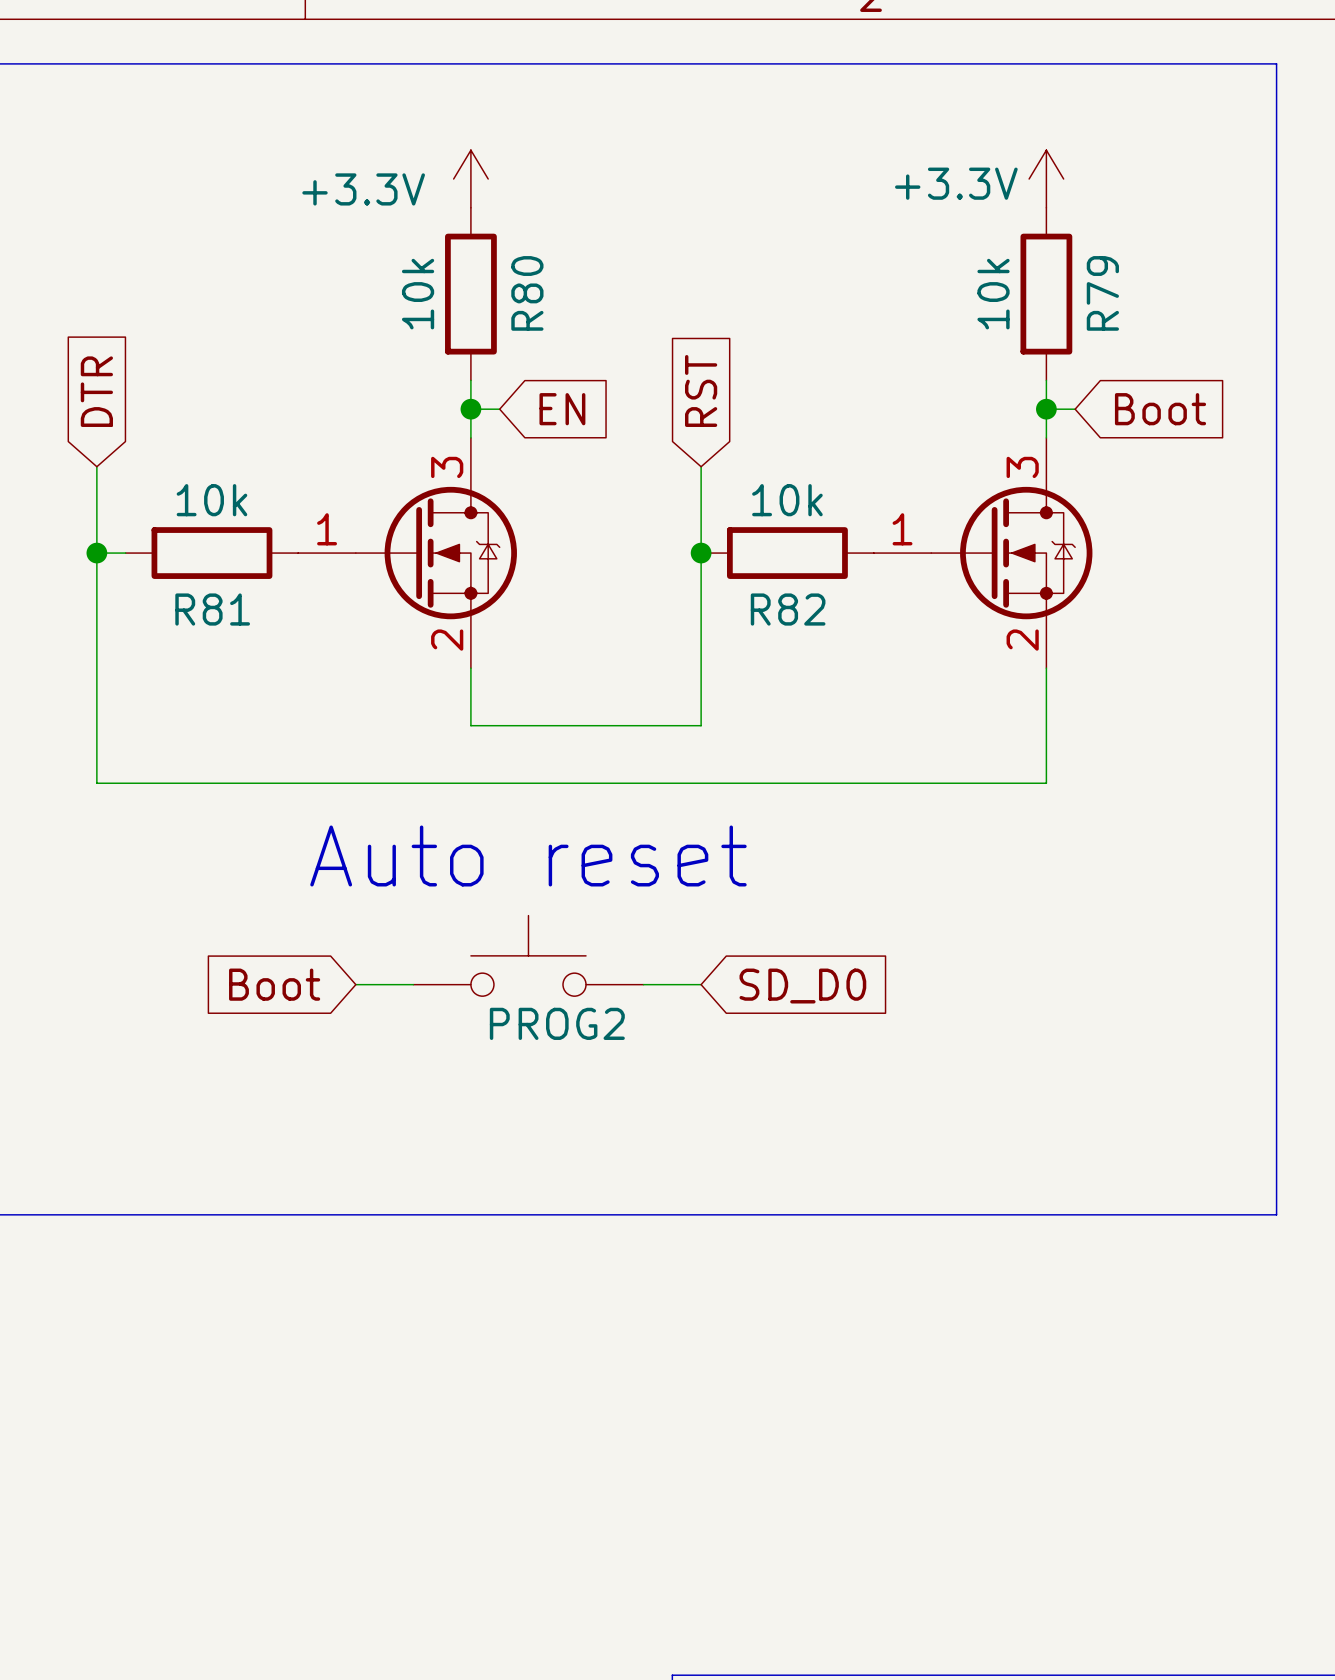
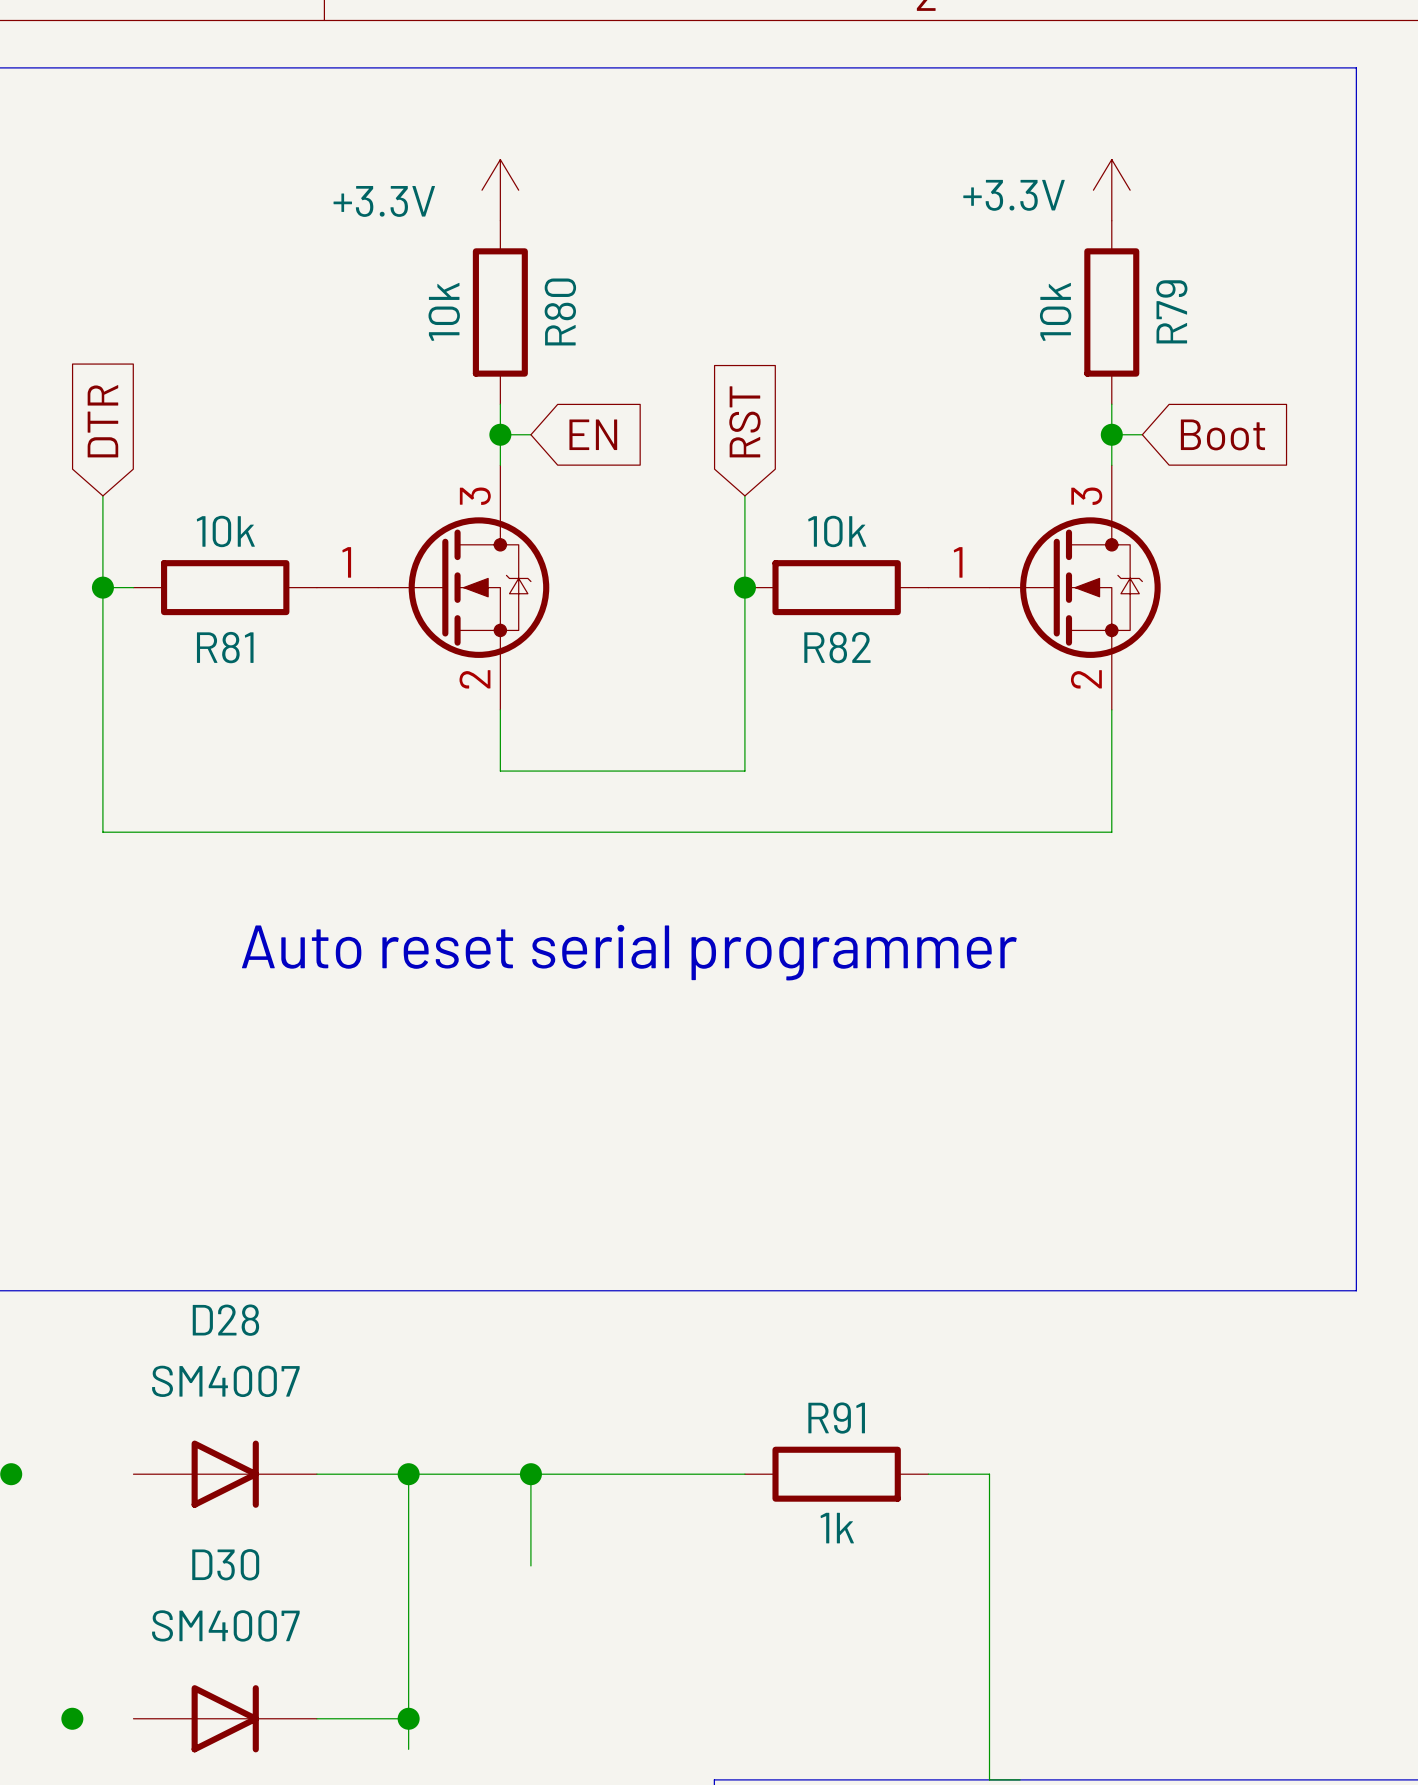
text: Auto reset (528, 855) -> none
text: none -> Auto reset serial programmer (629, 952)
PROG2: (528, 955) -> none
global label: Boot (274, 984) -> none
wire: (355, 984) (413, 984) -> none
wire: (643, 984) (701, 984) -> none
global label: SD_D0 (802, 986) -> none
junction: none -> (11, 1474)
D28: none -> SM4007 (225, 1474)
wire: none -> (316, 1474) (744, 1474)
wire: none -> (408, 1474) (408, 1749)
junction: none -> (408, 1474)
wire: none -> (530, 1474) (530, 1565)
junction: none -> (530, 1474)
R91: none -> 1k (836, 1474)
wire: none -> (928, 1474) (989, 1474) (989, 1779) (1020, 1779)
junction: none -> (72, 1718)
D30: none -> SM4007 (225, 1718)
wire: none -> (316, 1718) (408, 1718)
junction: none -> (408, 1718)

